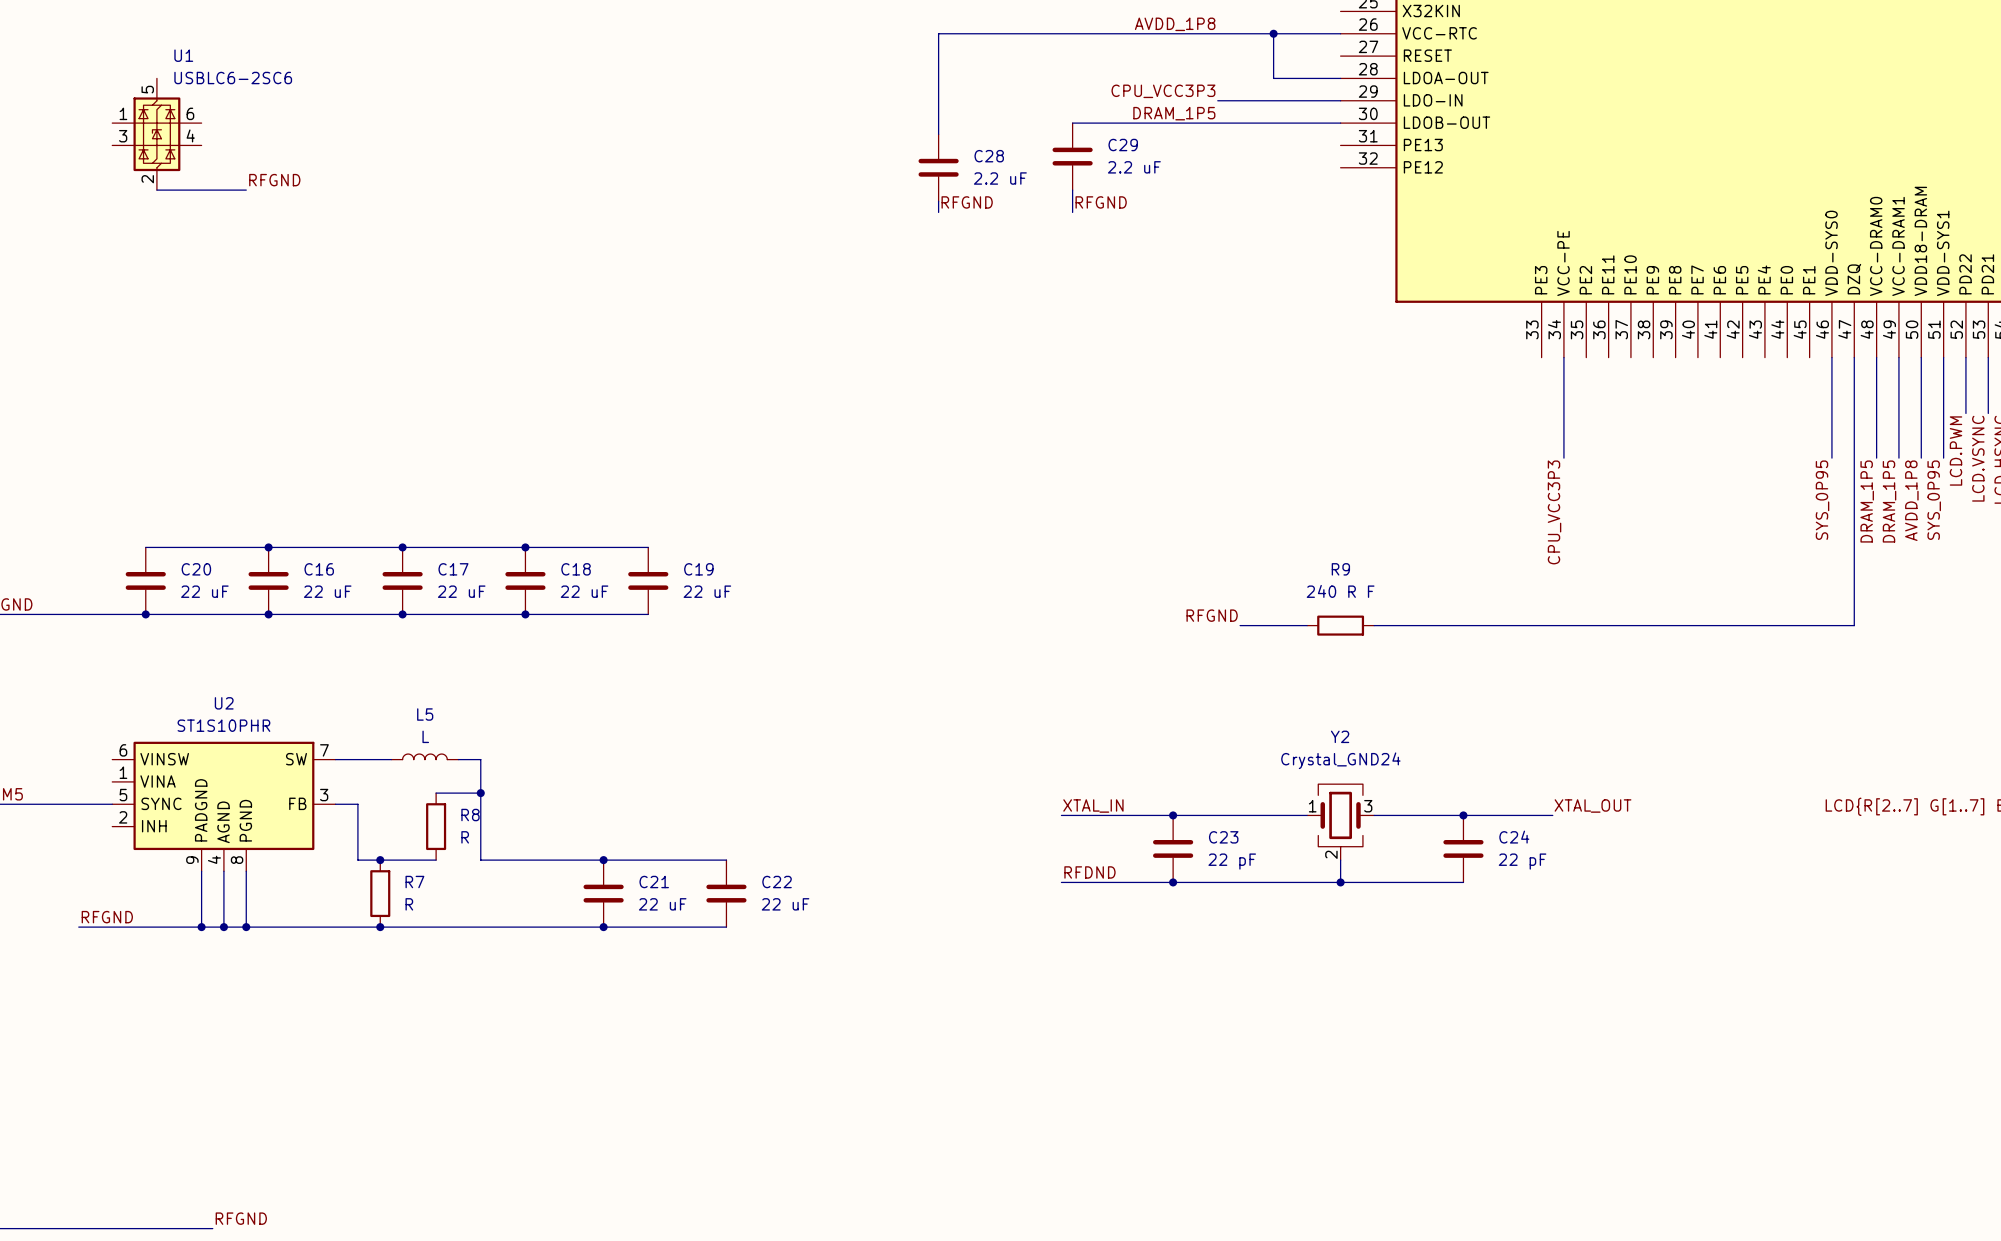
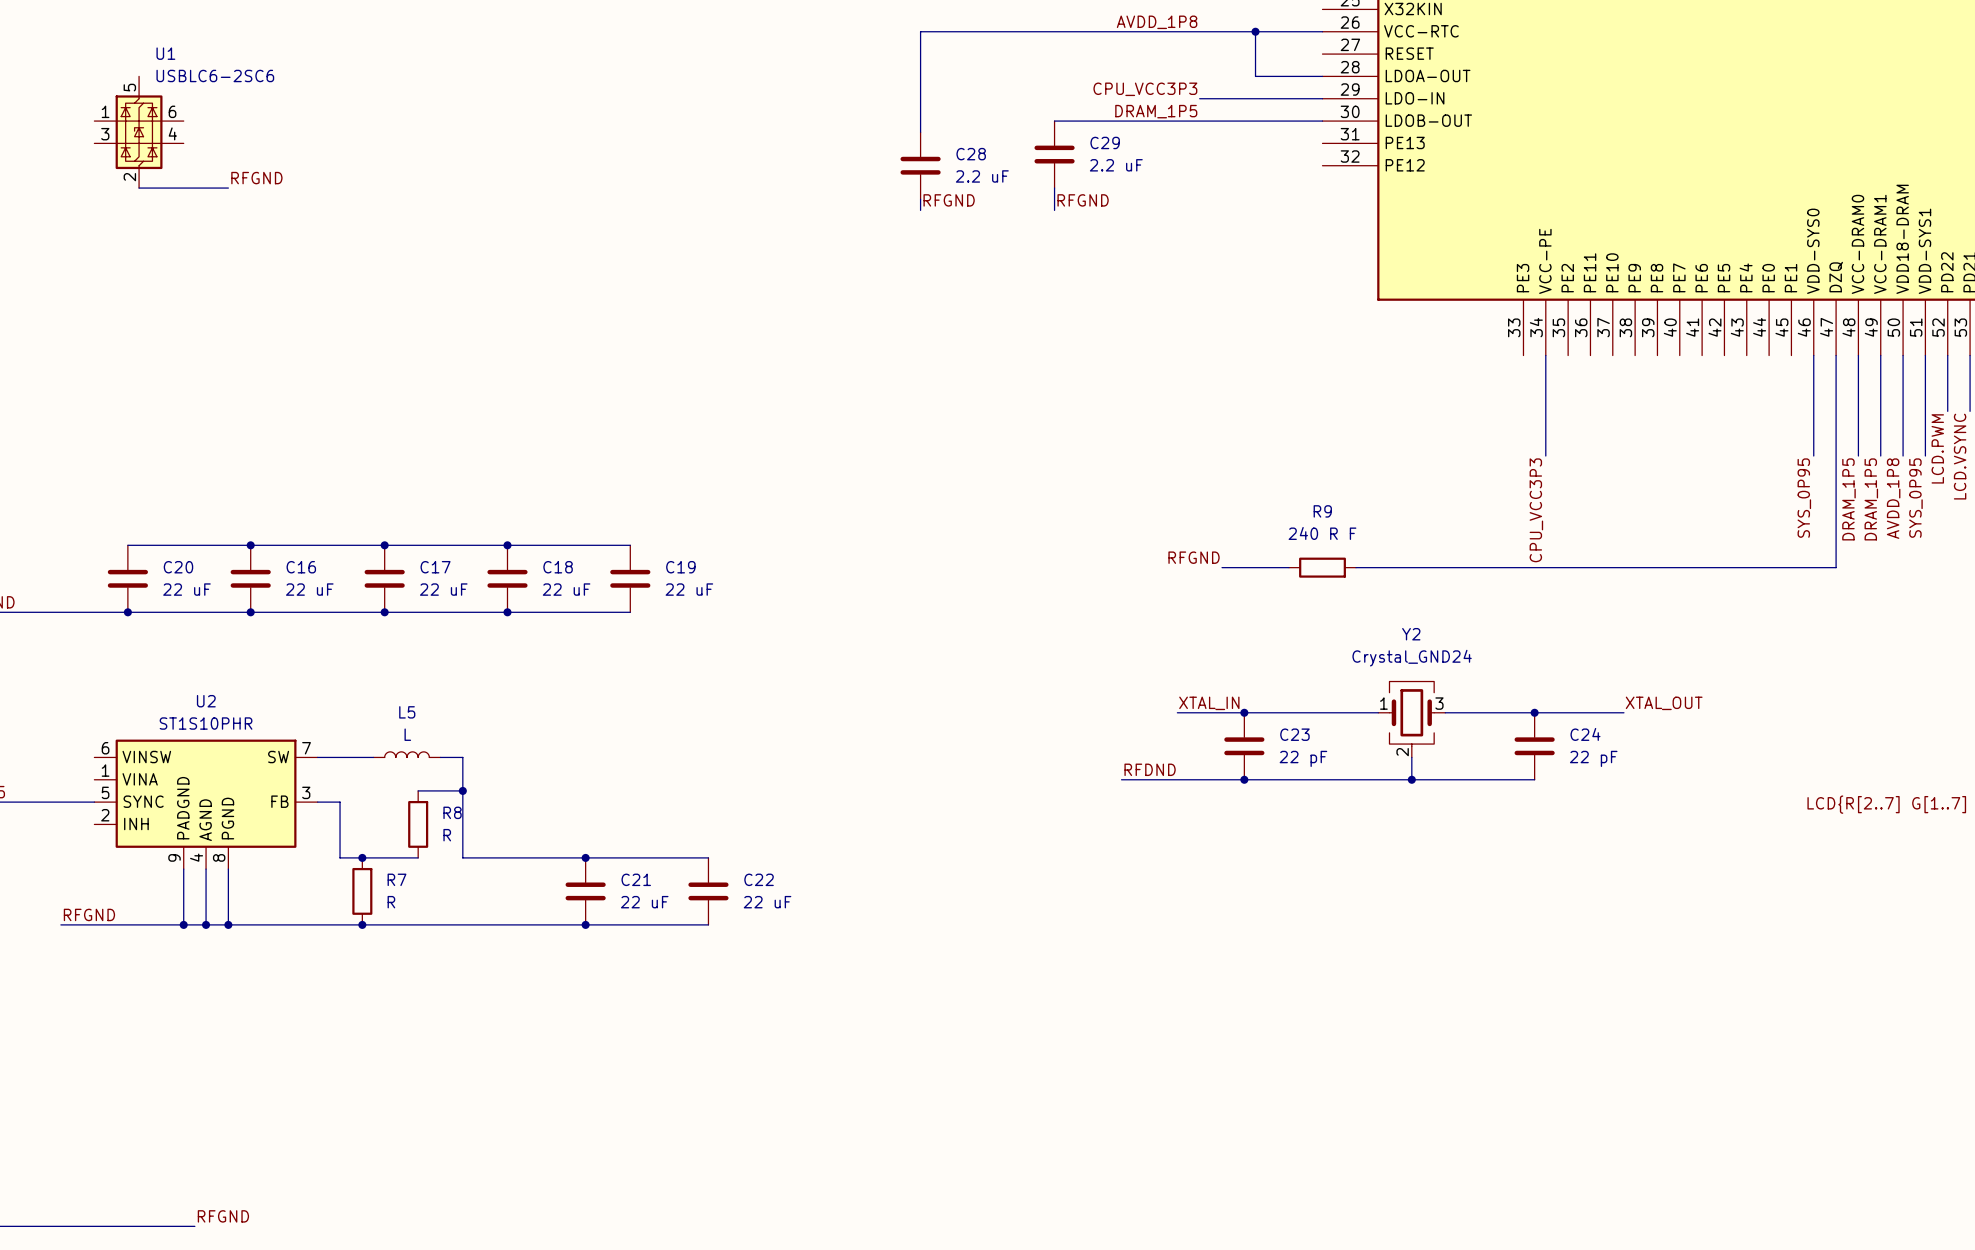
wire: (1854, 569) (1854, 625) (1374, 625) -> (1836, 567) (1356, 567)
label position: RFGND (1212, 615) -> RFGND (1194, 557)
wire: (1240, 625) (1307, 625) -> (1222, 567) (1289, 567)
R9 position: (1340, 625) -> (1322, 567)
wire: none -> (1177, 712) (1378, 712)
junction: none -> (1244, 712)
junction: none -> (1534, 712)
wire: none -> (1121, 779) (1534, 779)
junction: none -> (1244, 779)
label position: XTAL_IN (1093, 806) -> XTAL_IN (1209, 703)
label position: XTAL_OUT (1593, 806) -> XTAL_OUT (1664, 703)
wire: (1061, 815) (1307, 815) -> none
junction: (1173, 815) -> none
wire: (1374, 815) (1552, 815) -> (1445, 712) (1623, 712)
junction position: (1463, 815) -> (1411, 779)
Y2 position: (1340, 822) -> (1411, 719)
C23 position: (1173, 848) -> (1244, 746)
C24 position: (1463, 848) -> (1534, 746)
wire: (1340, 860) (1340, 882) -> (1411, 757) (1411, 779)
label position: RFDND (1089, 872) -> RFDND (1150, 769)
wire: (1061, 882) (1463, 882) -> none
junction: (1173, 882) -> none
junction: (1340, 882) -> none

